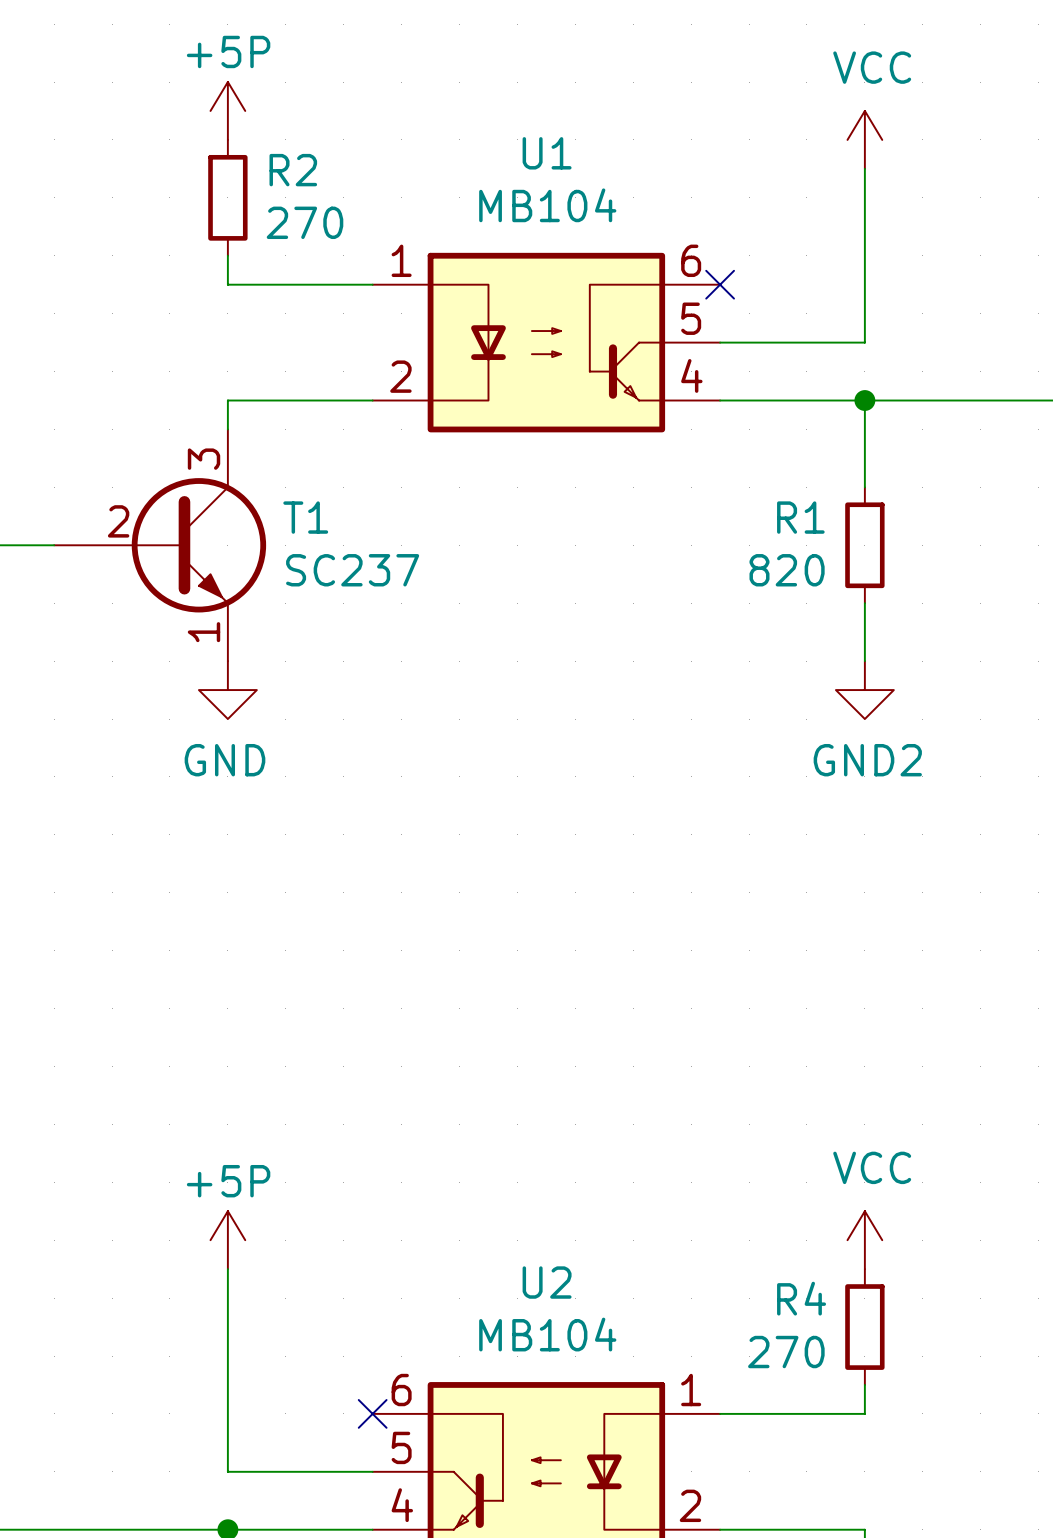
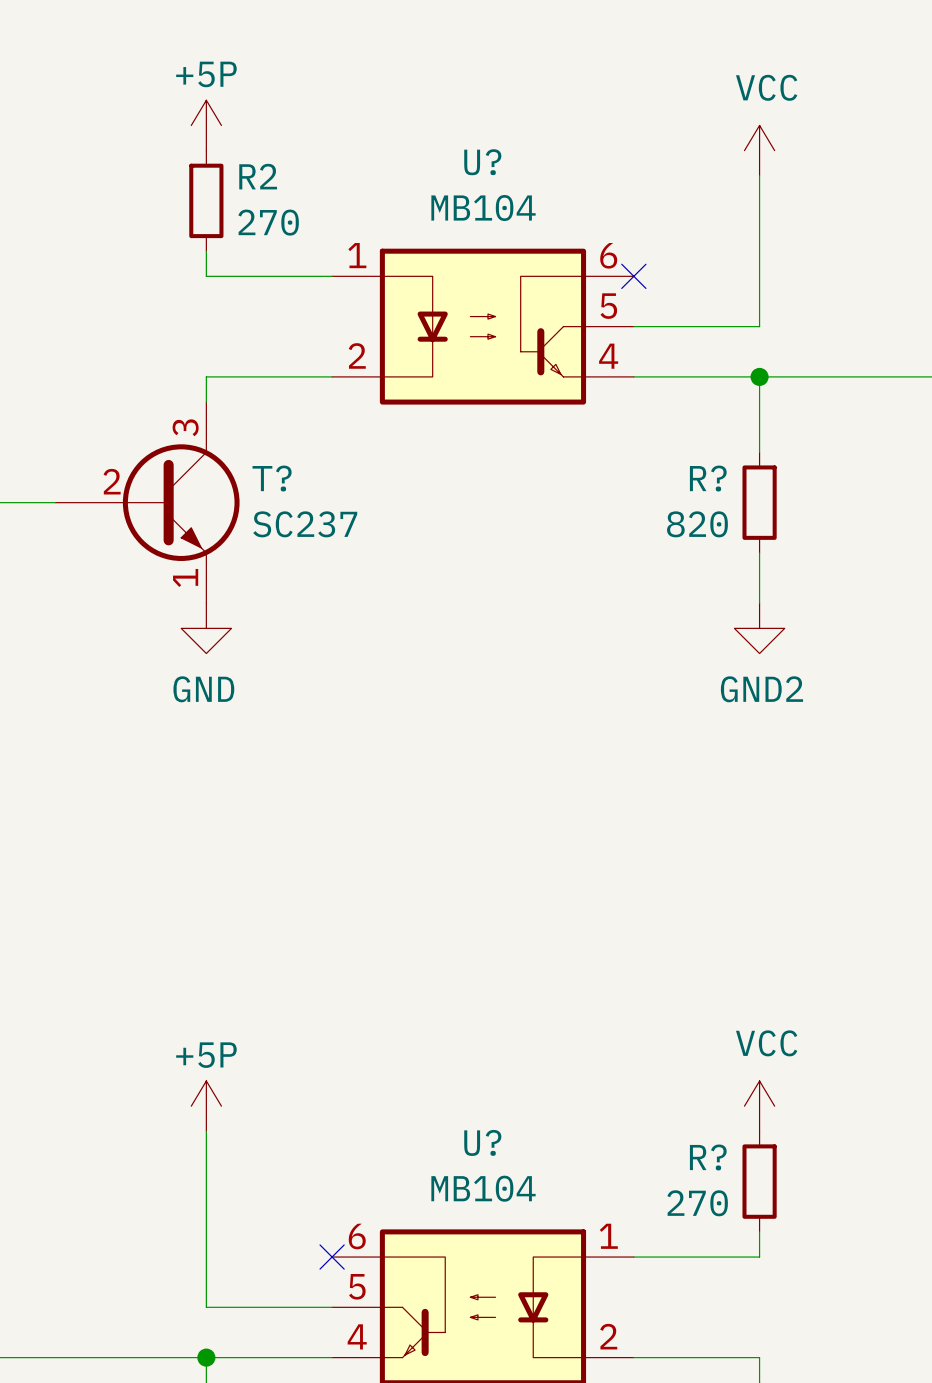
U1 name: U1 (547, 153) -> U? (482, 162)
T1 name: T1 (305, 517) -> T? (272, 478)
R1 name: R1 (800, 517) -> R? (708, 478)
U2 name: U2 (547, 1282) -> U? (482, 1142)
R4 name: R4 (801, 1298) -> R? (708, 1157)

